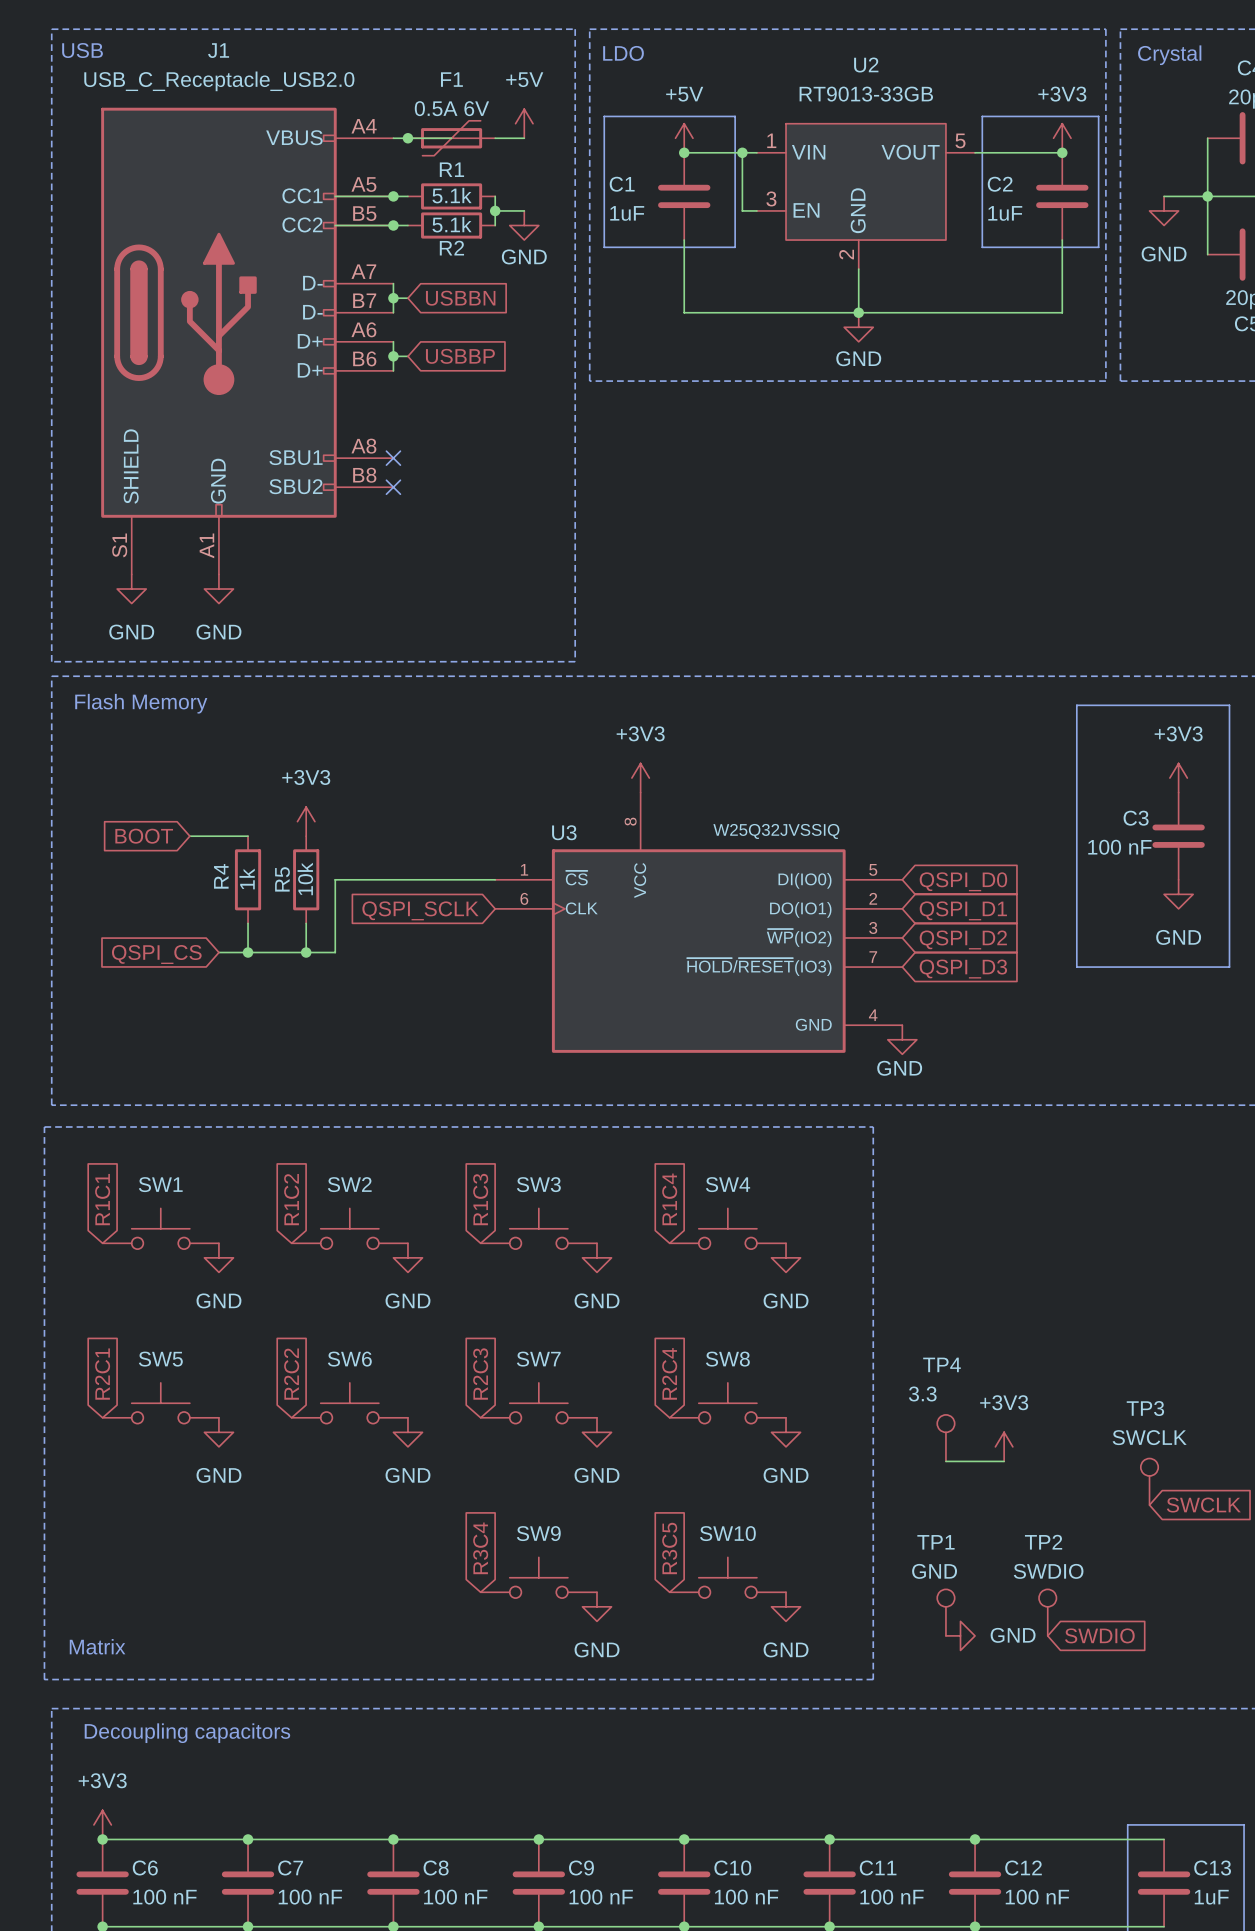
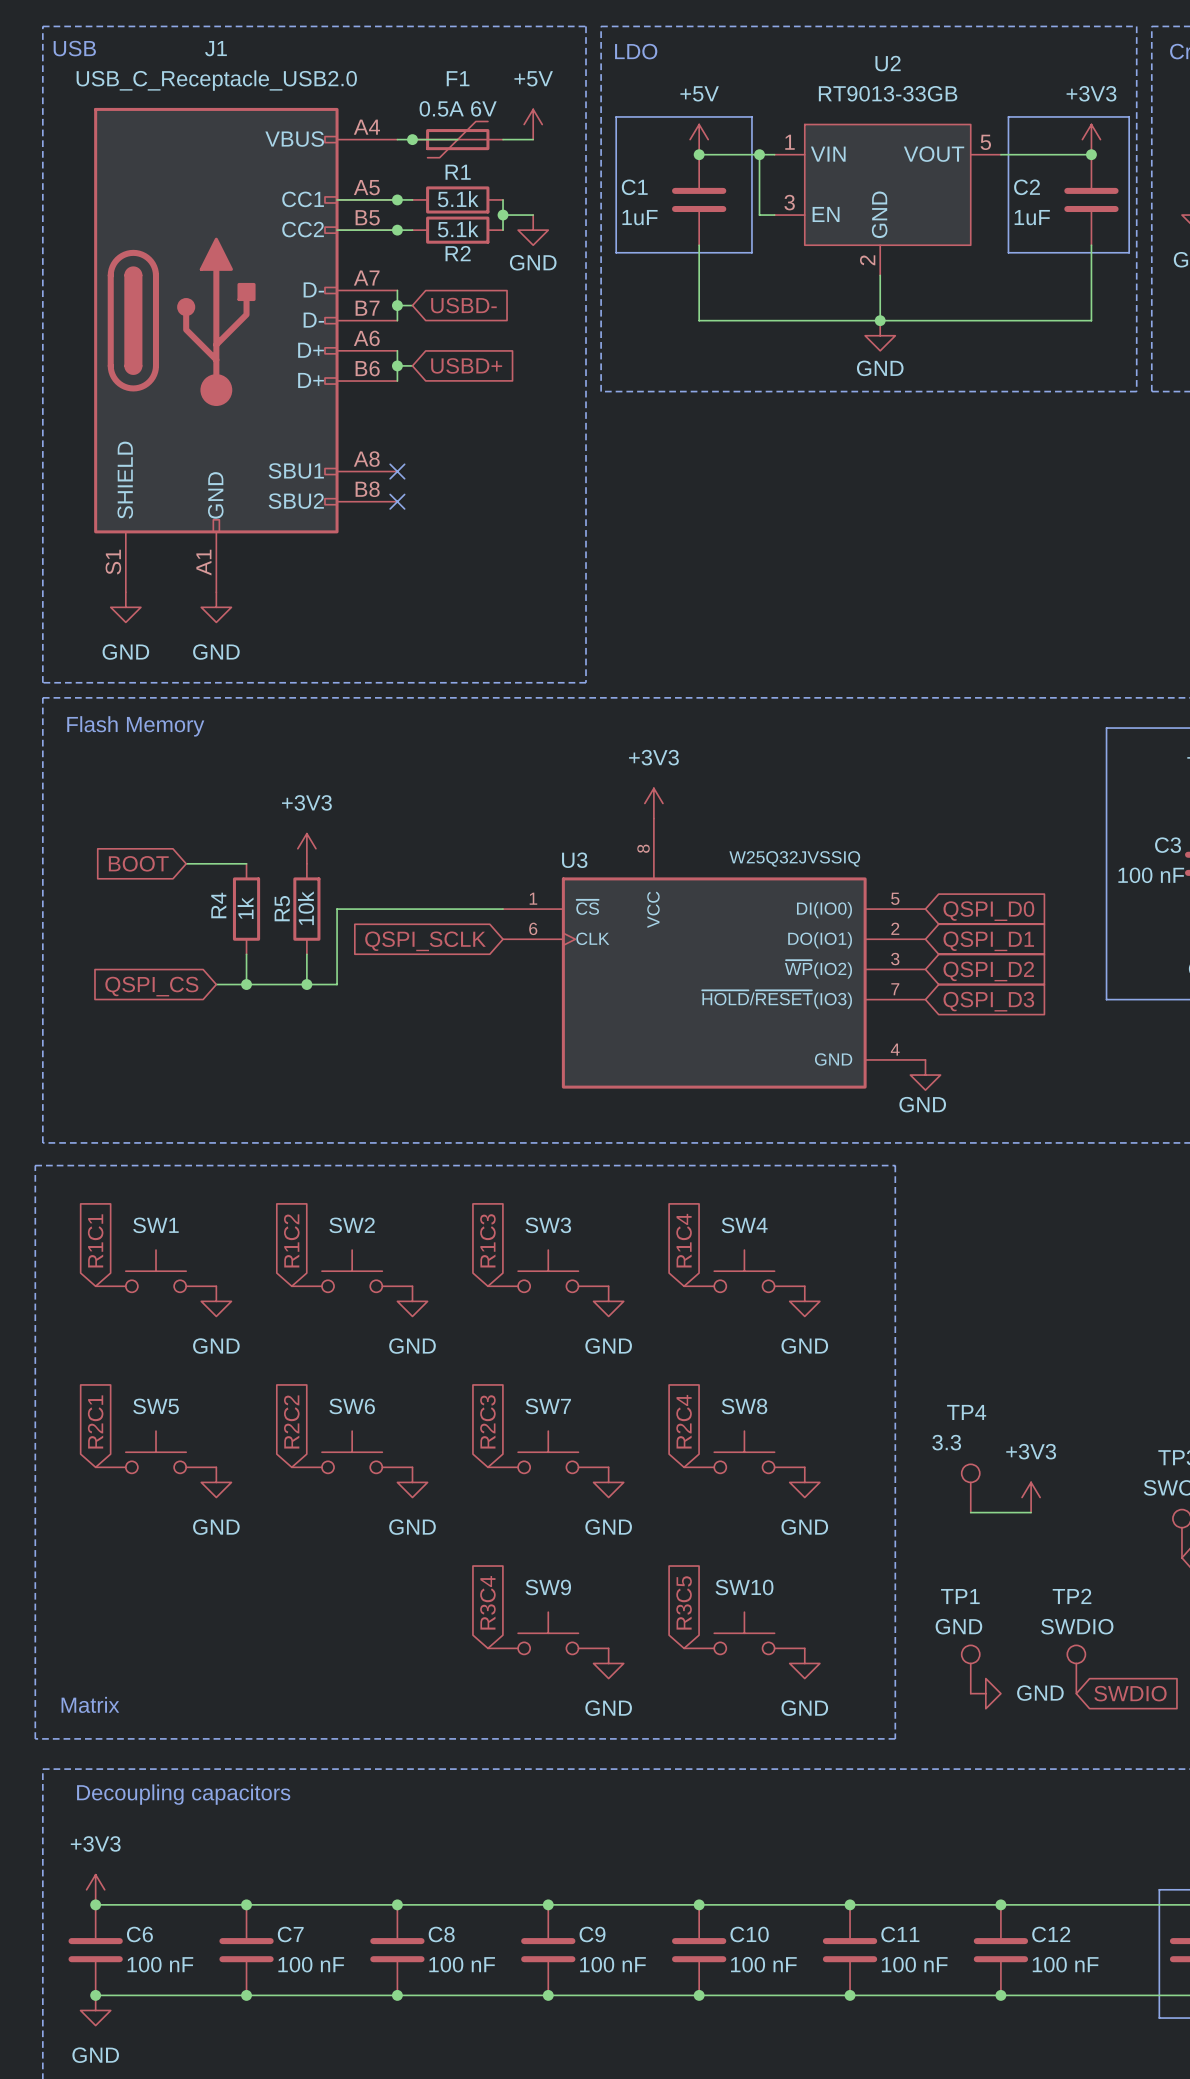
global label: USBBN (460, 298) -> USBD- (463, 305)
global label: USBBP (460, 356) -> USBD+ (466, 365)

